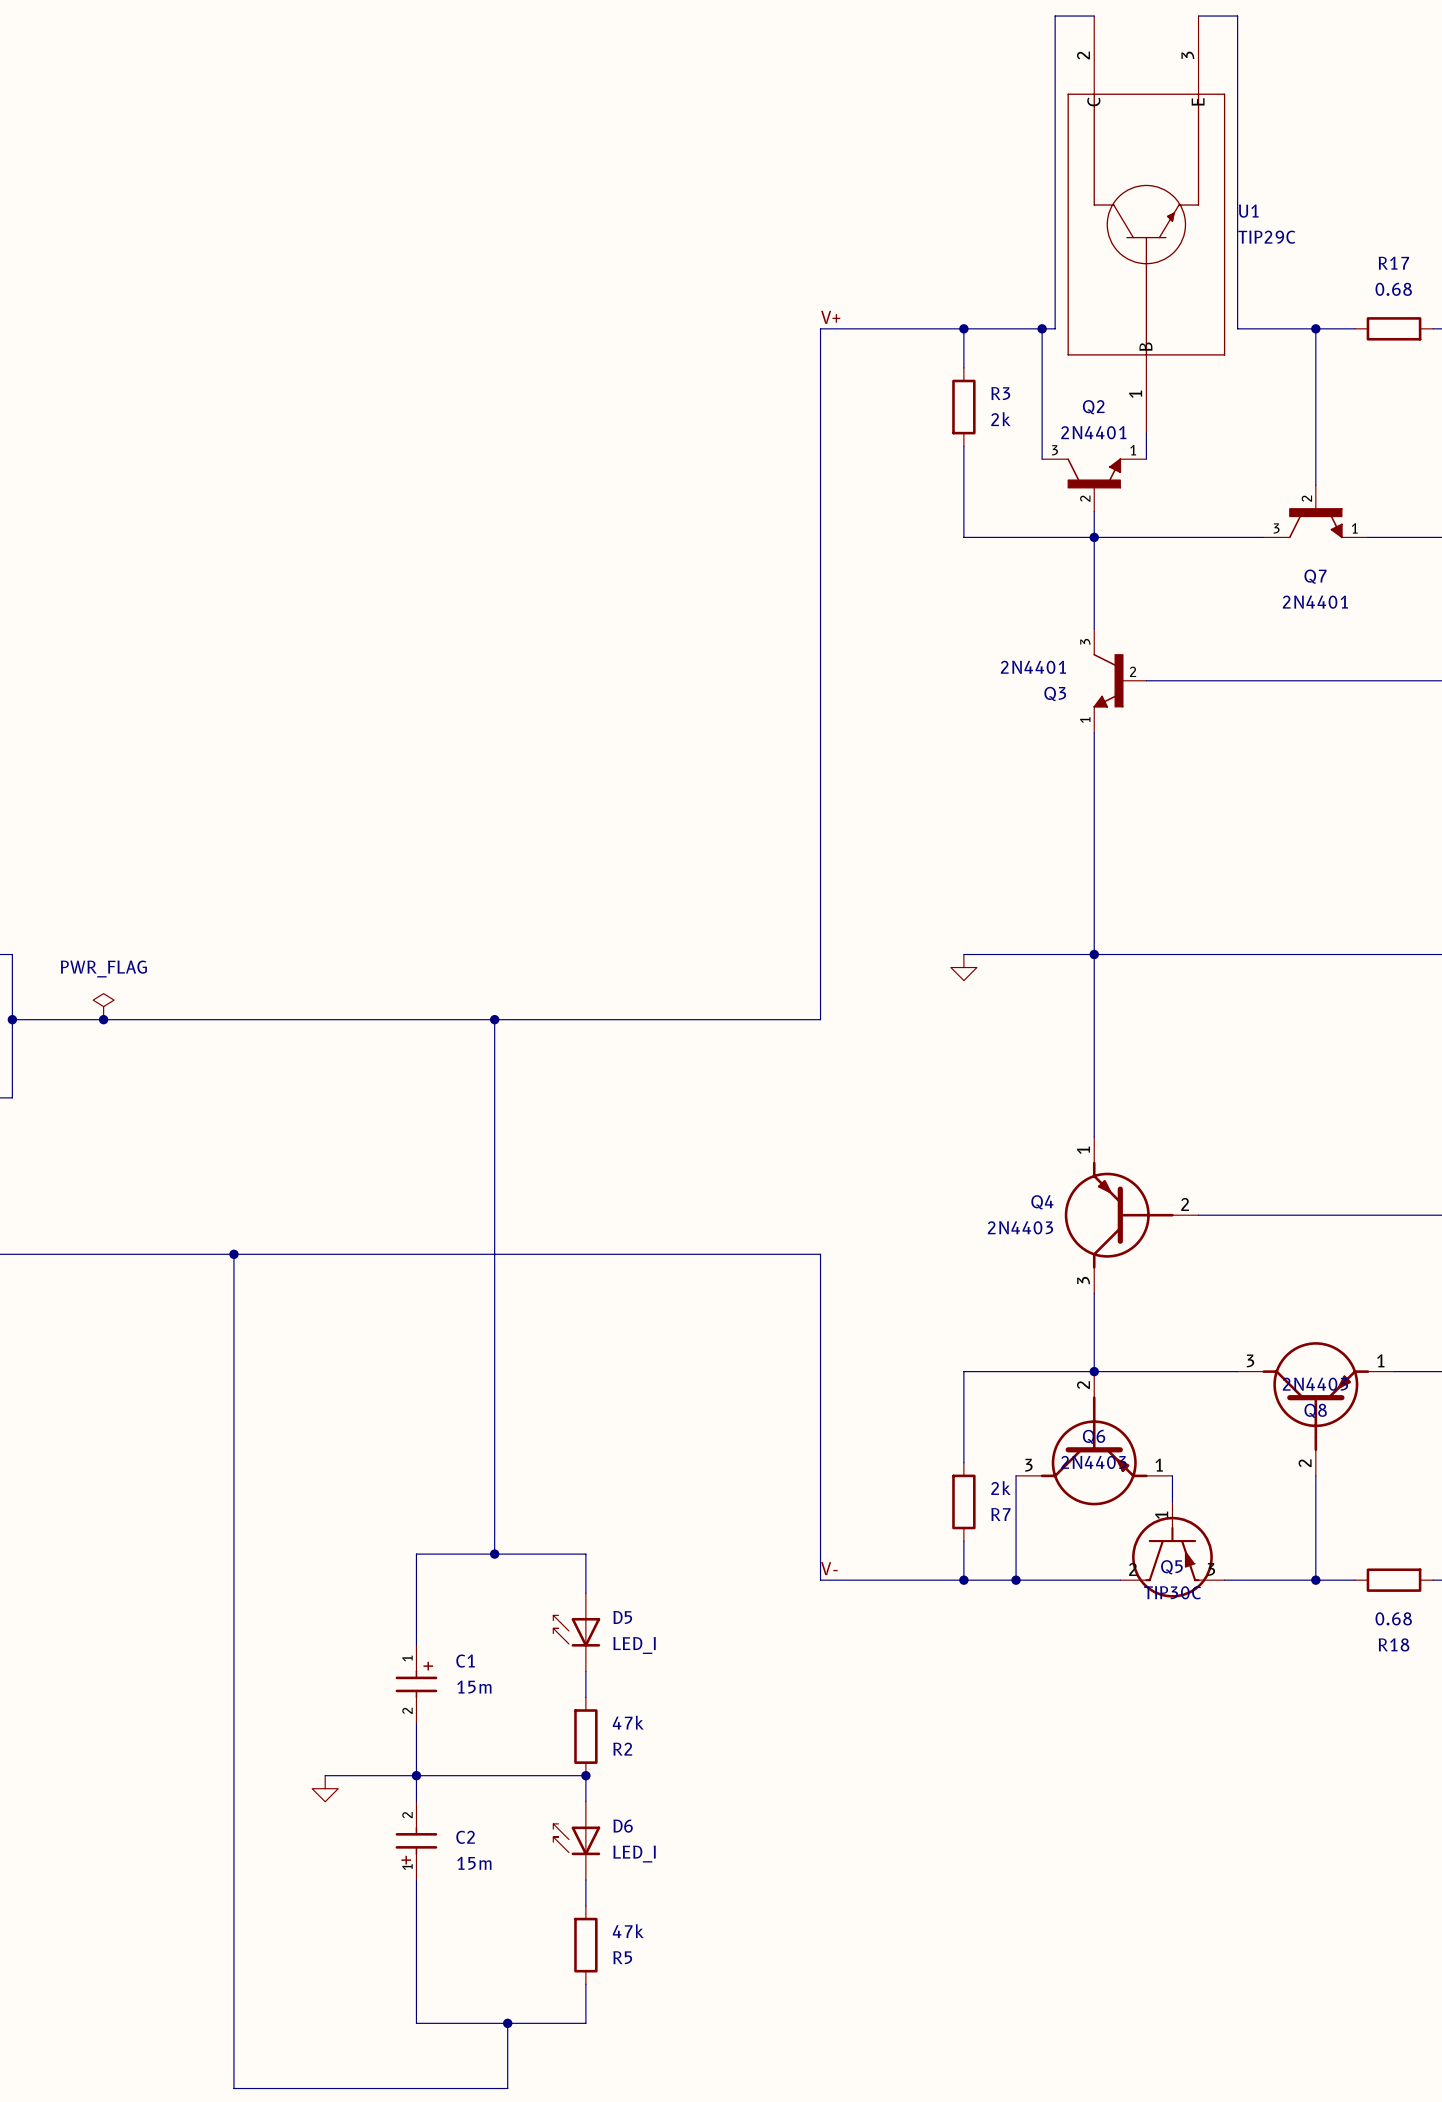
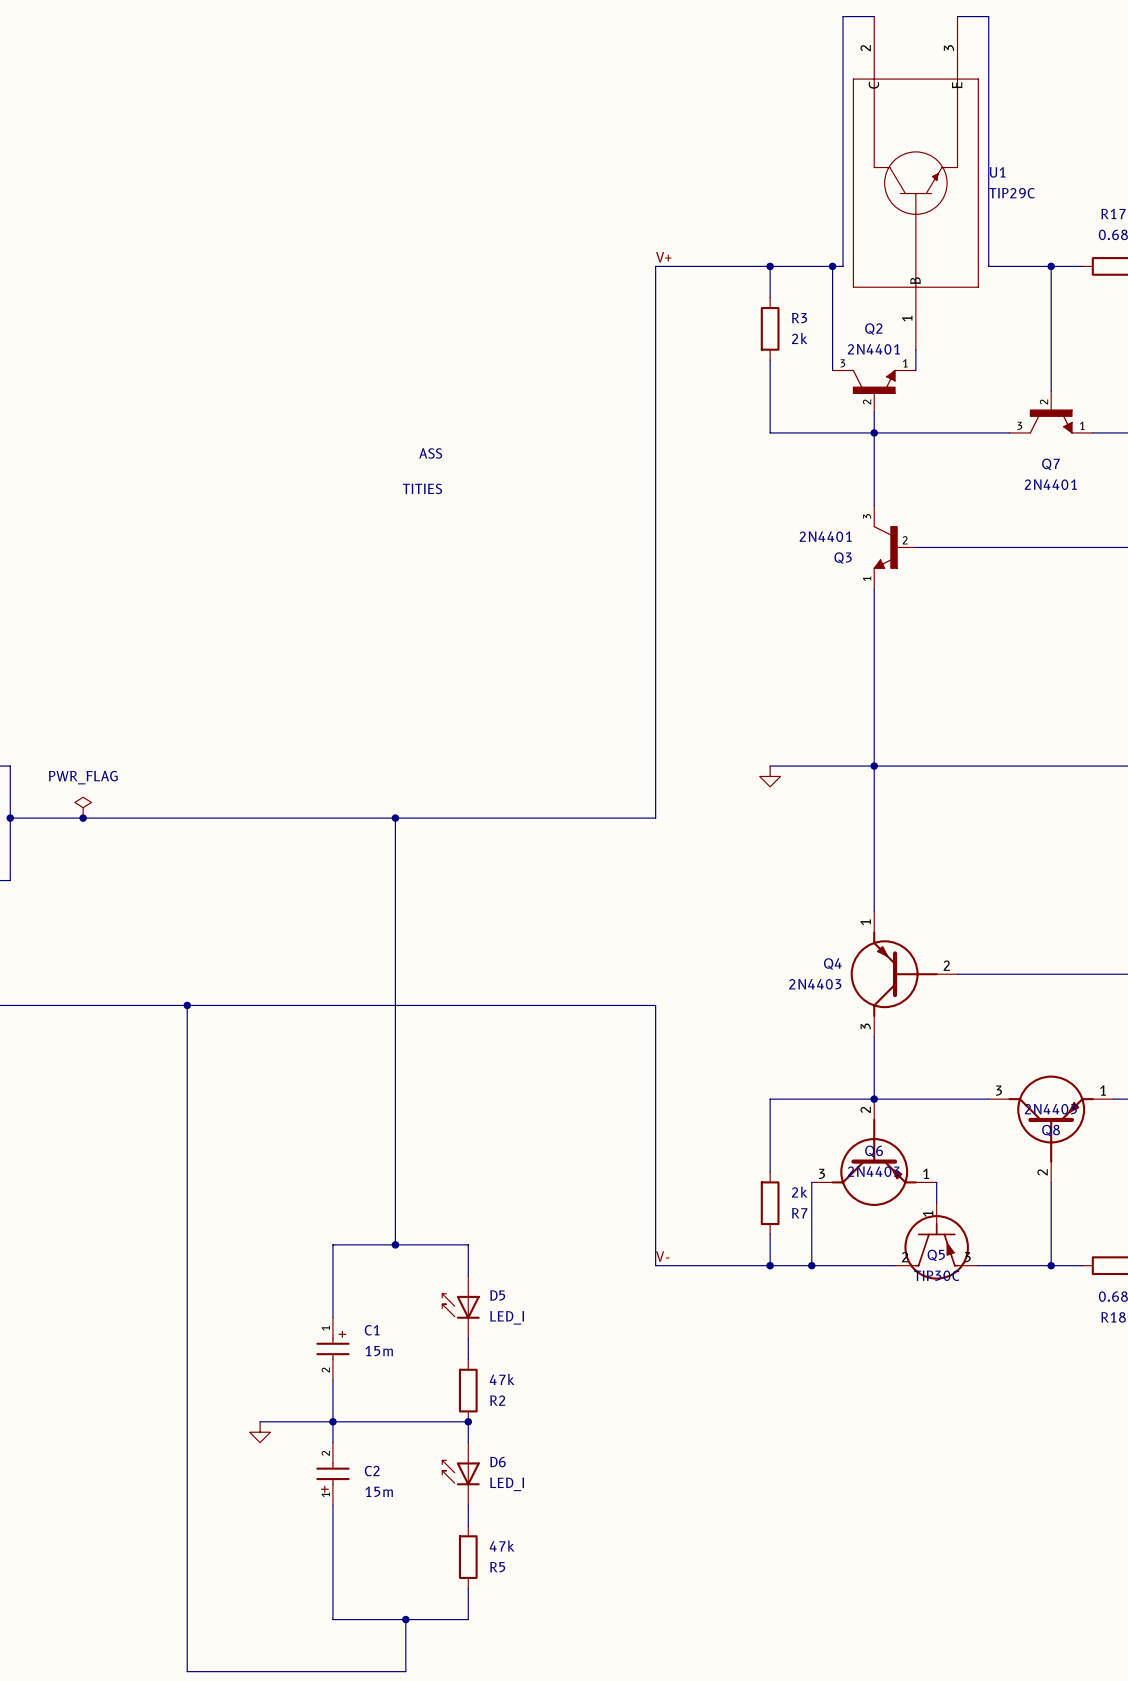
text: none -> ASS (430, 453)
text: none -> TITIES (422, 488)

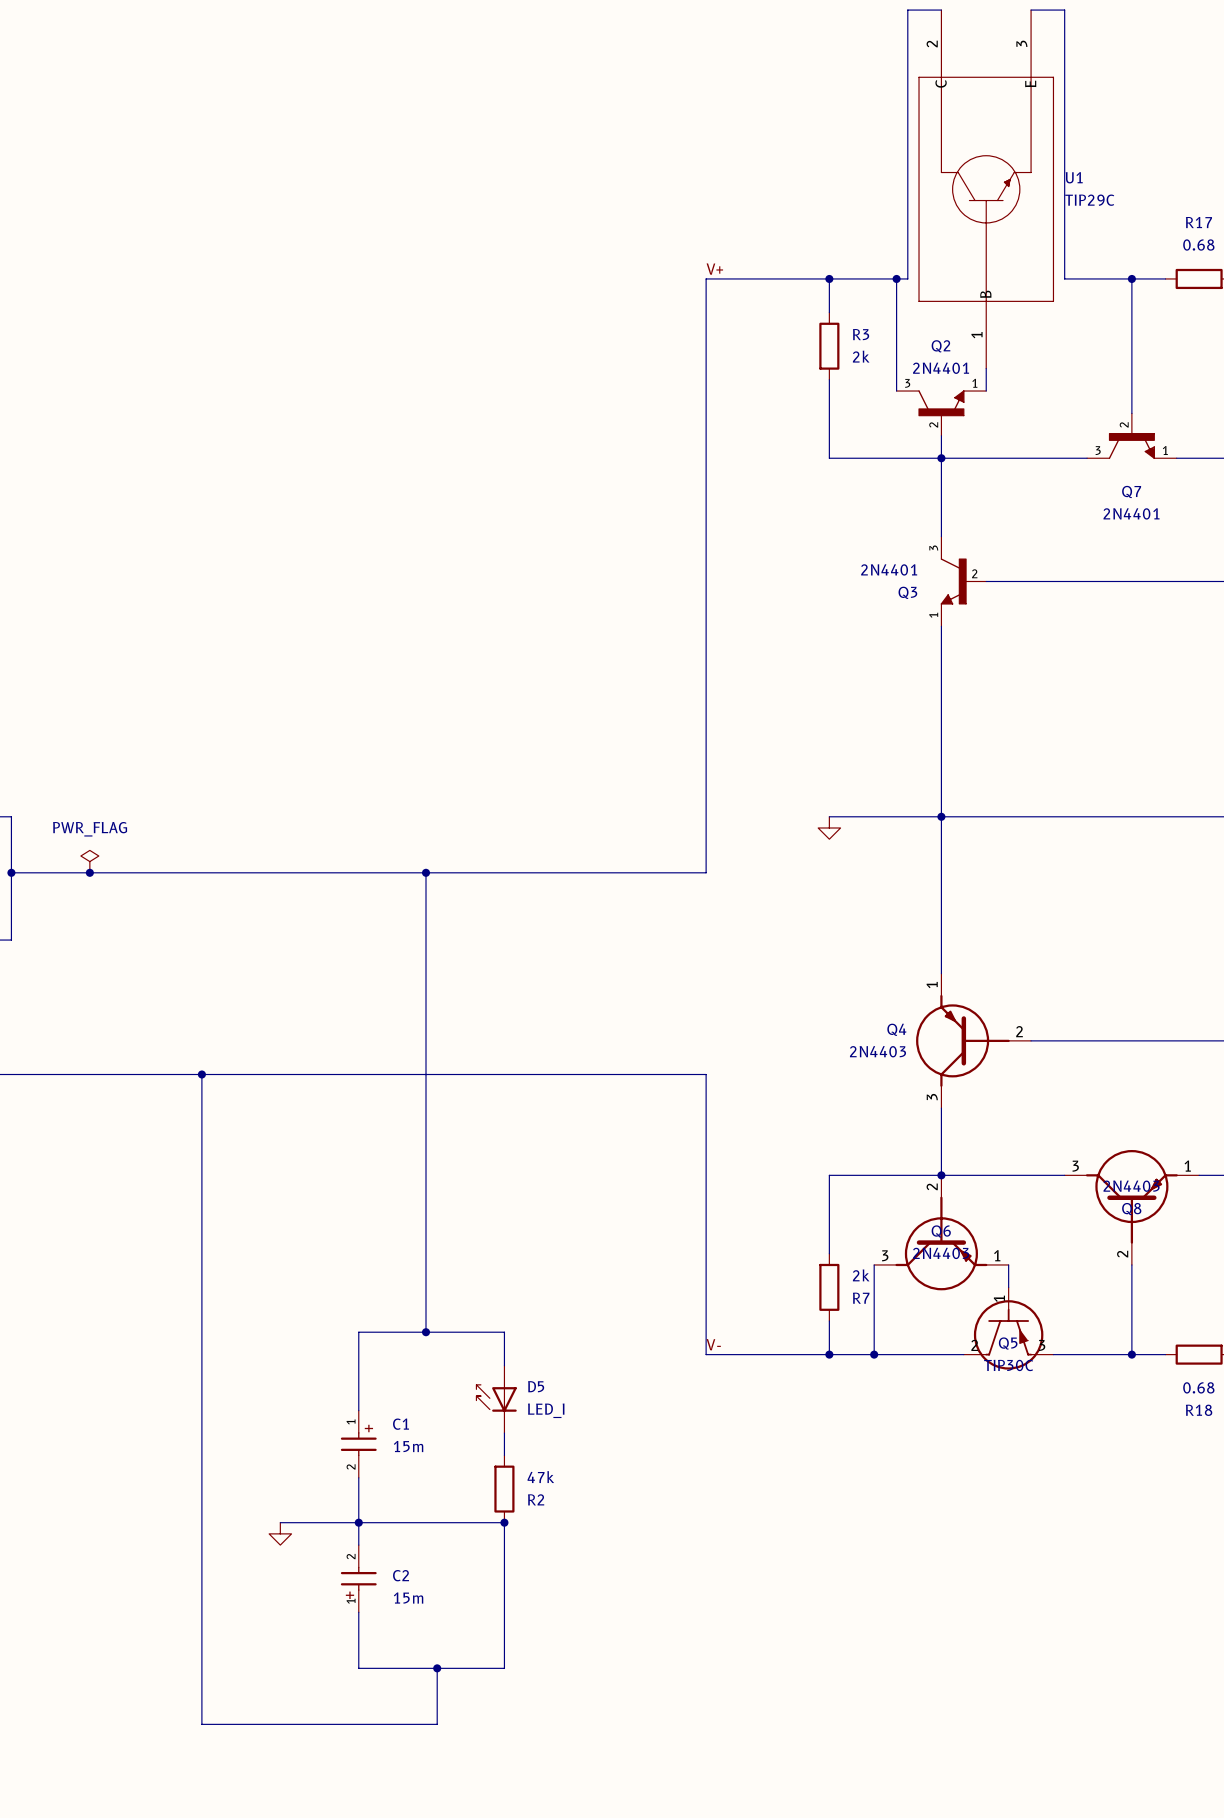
text: ASS (430, 453) -> none
text: TITIES (422, 488) -> none
D6: LED_I (460, 1473) -> none
wire: (332, 1557) (332, 1619) (468, 1619) (468, 1588) -> (358, 1668) (504, 1668) (504, 1634)
junction: none -> (437, 1668)
R5: 47k (468, 1557) -> none
wire: (187, 1609) (187, 1671) (405, 1671) (405, 1619) -> (201, 1724) (437, 1724) (437, 1668)
junction: (405, 1619) -> none

